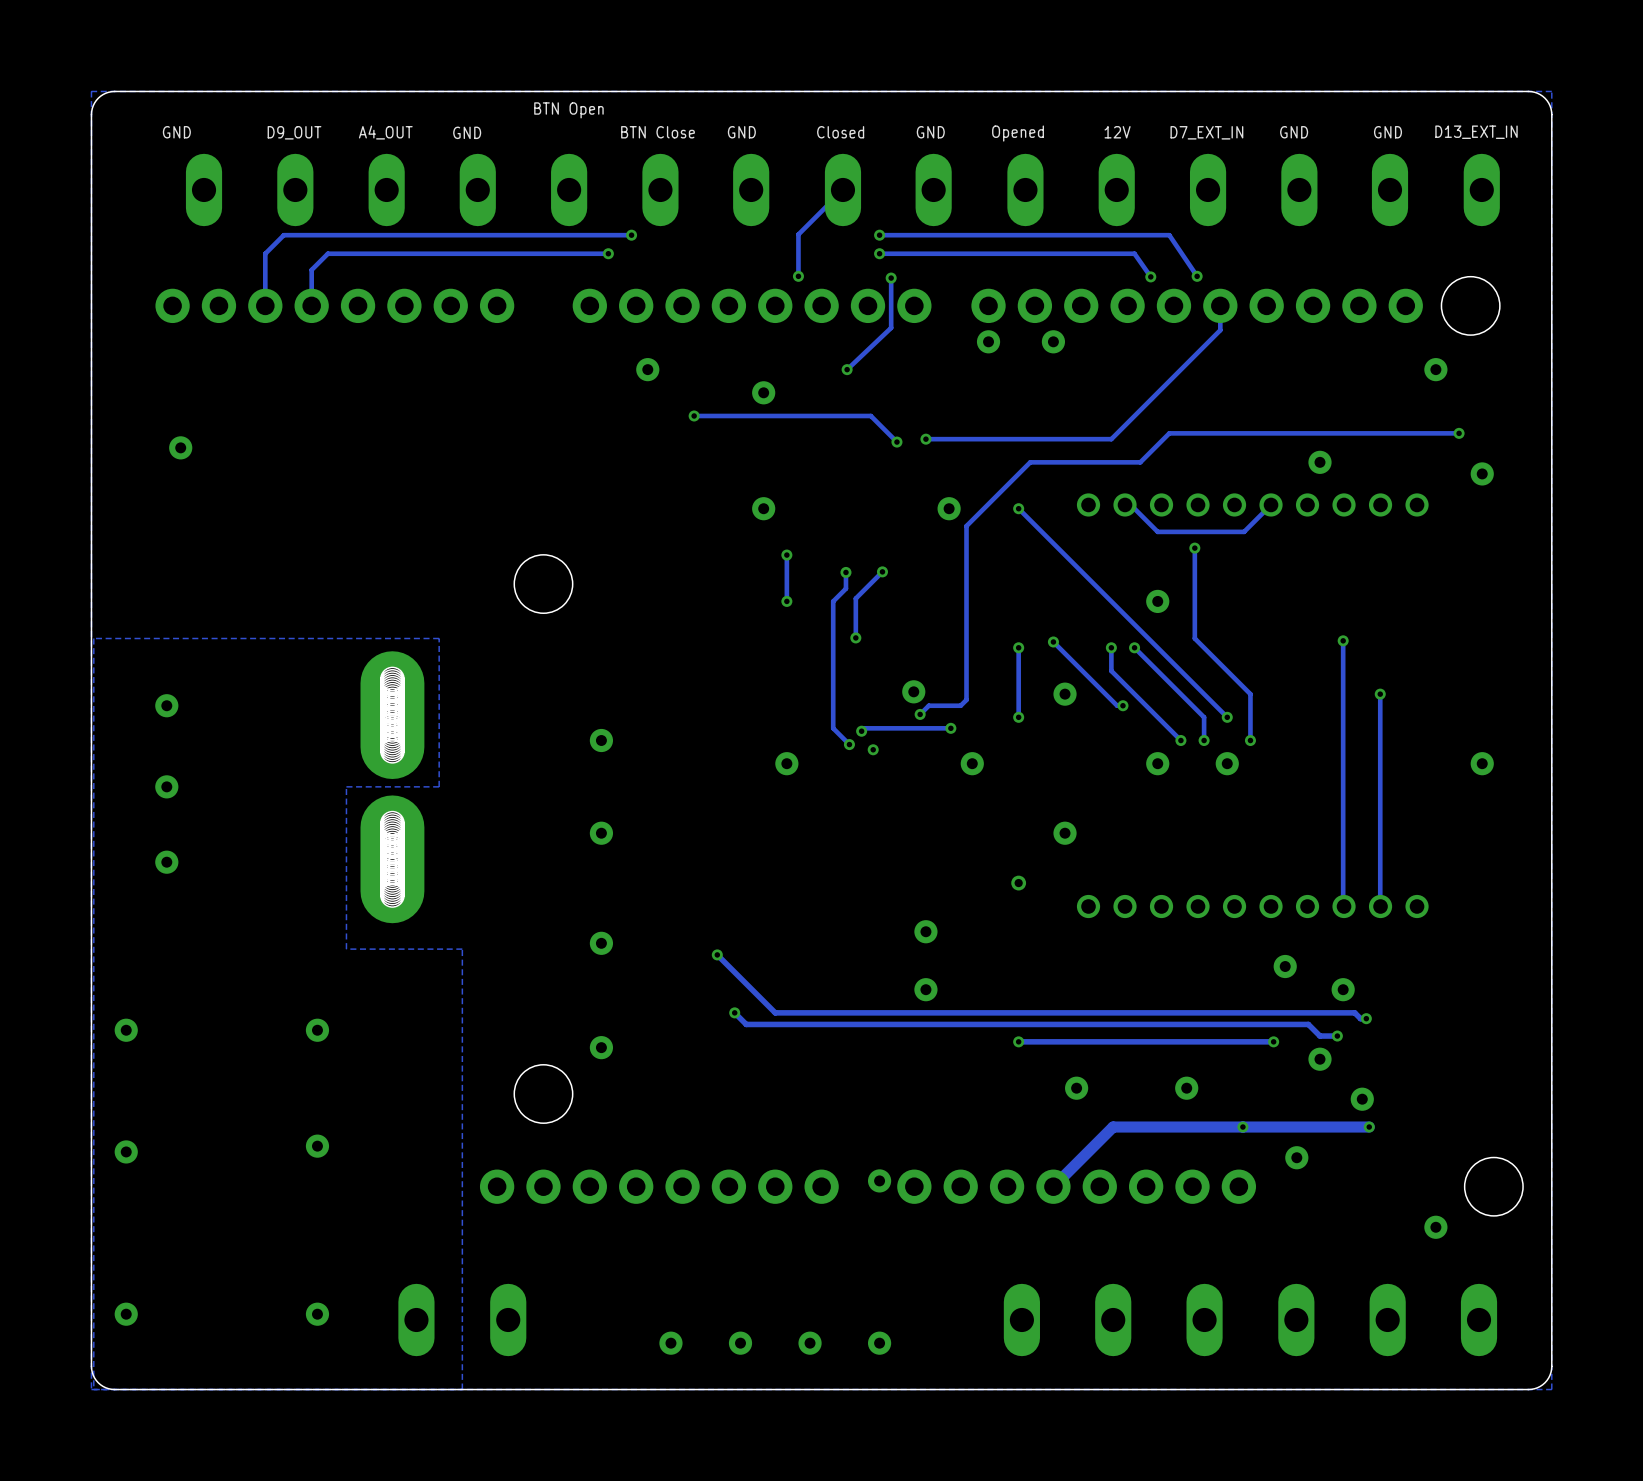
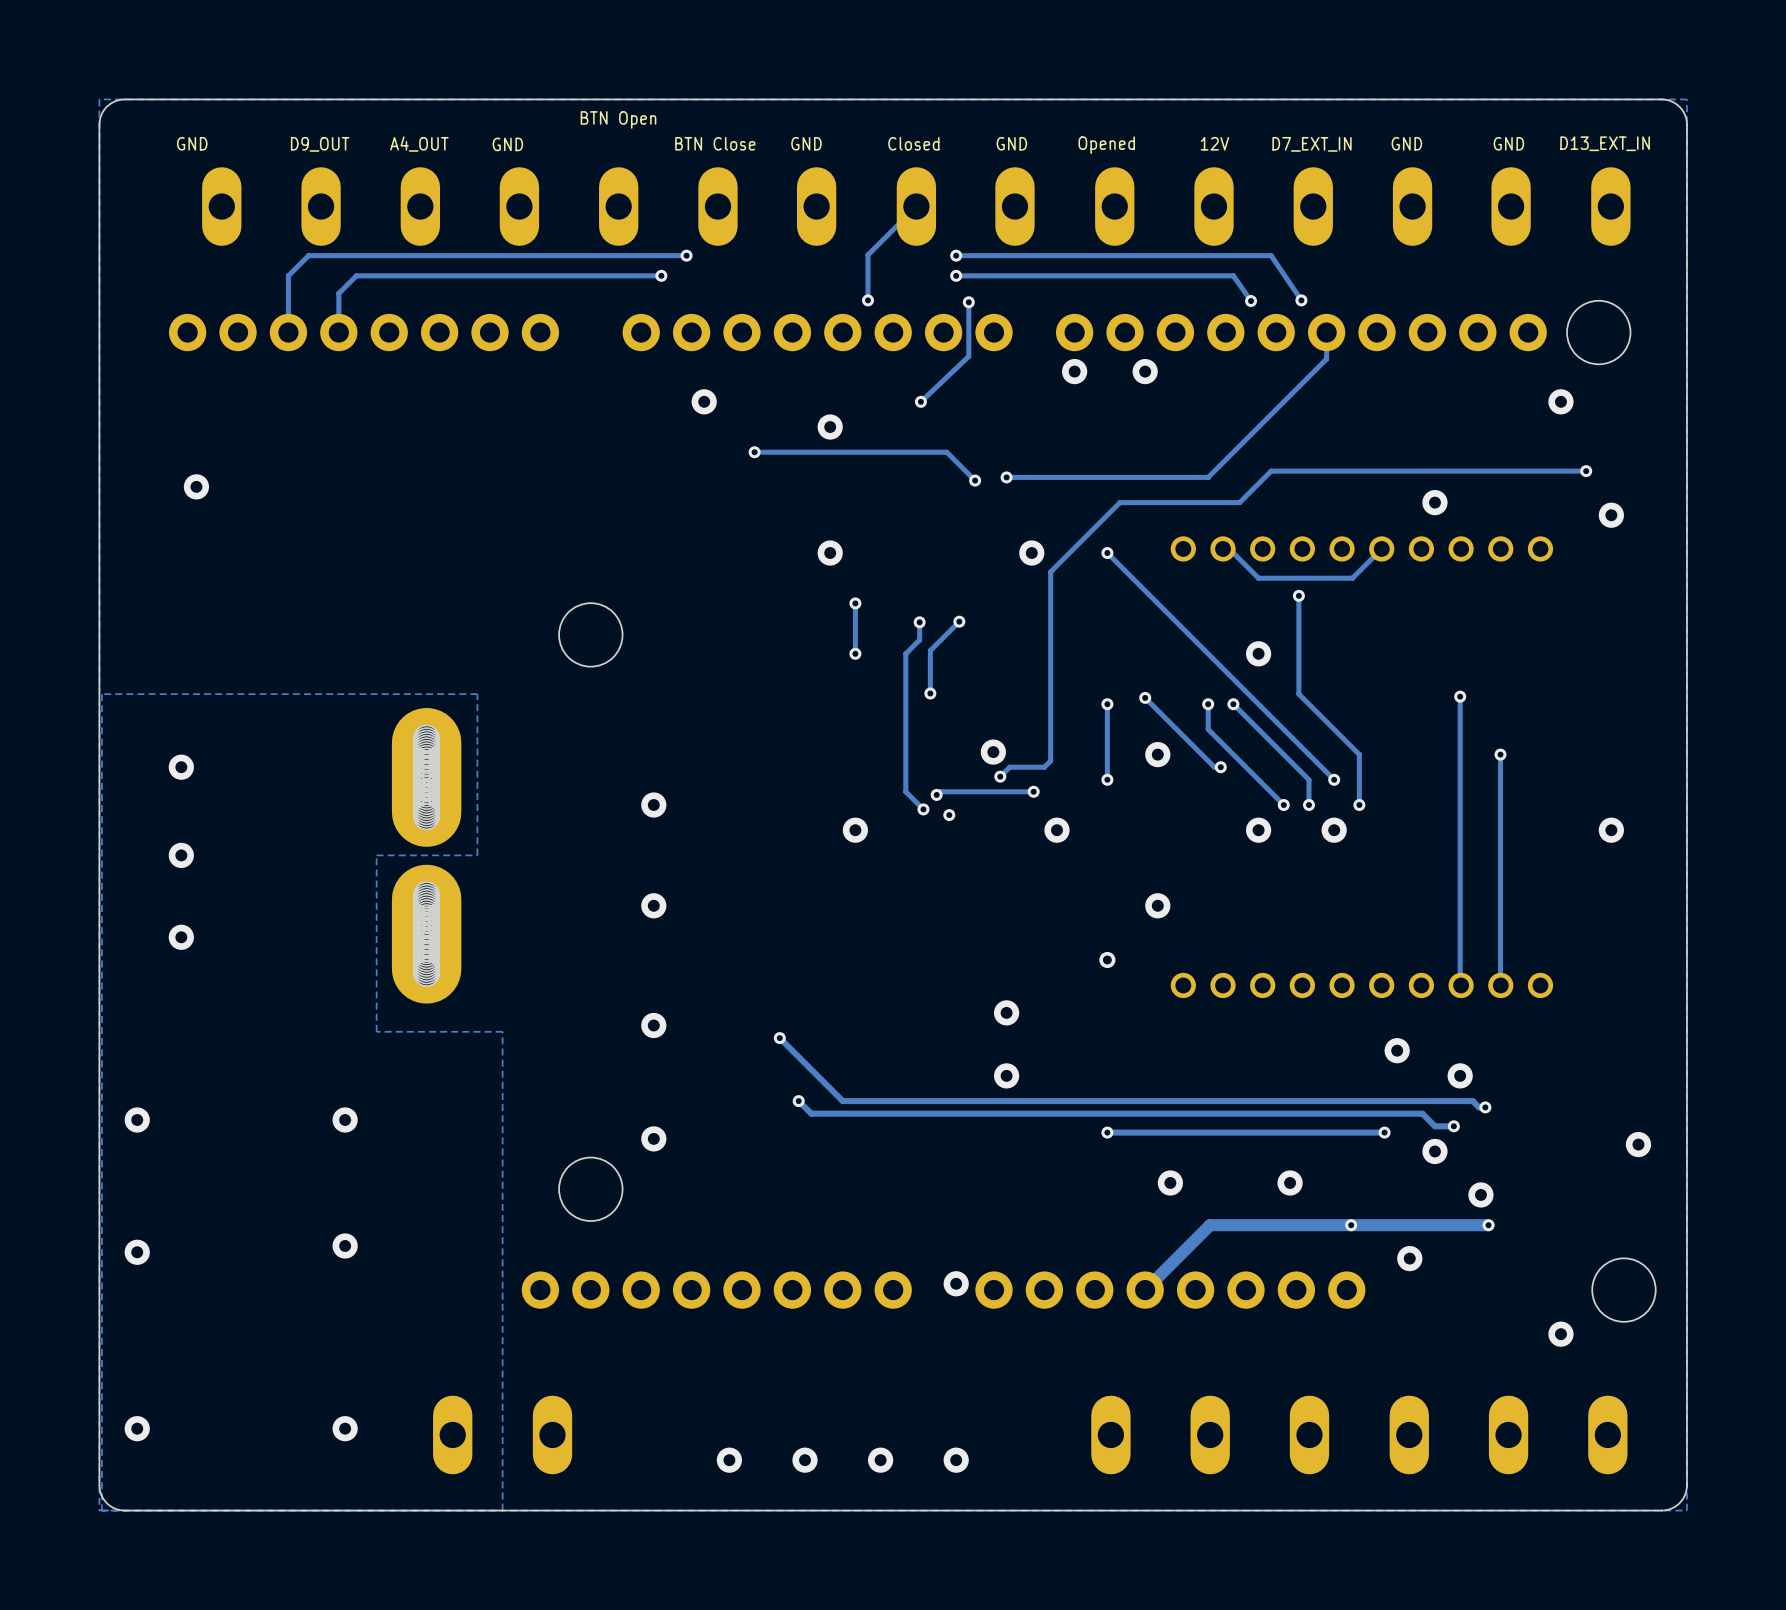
via: none -> (1638, 1144)

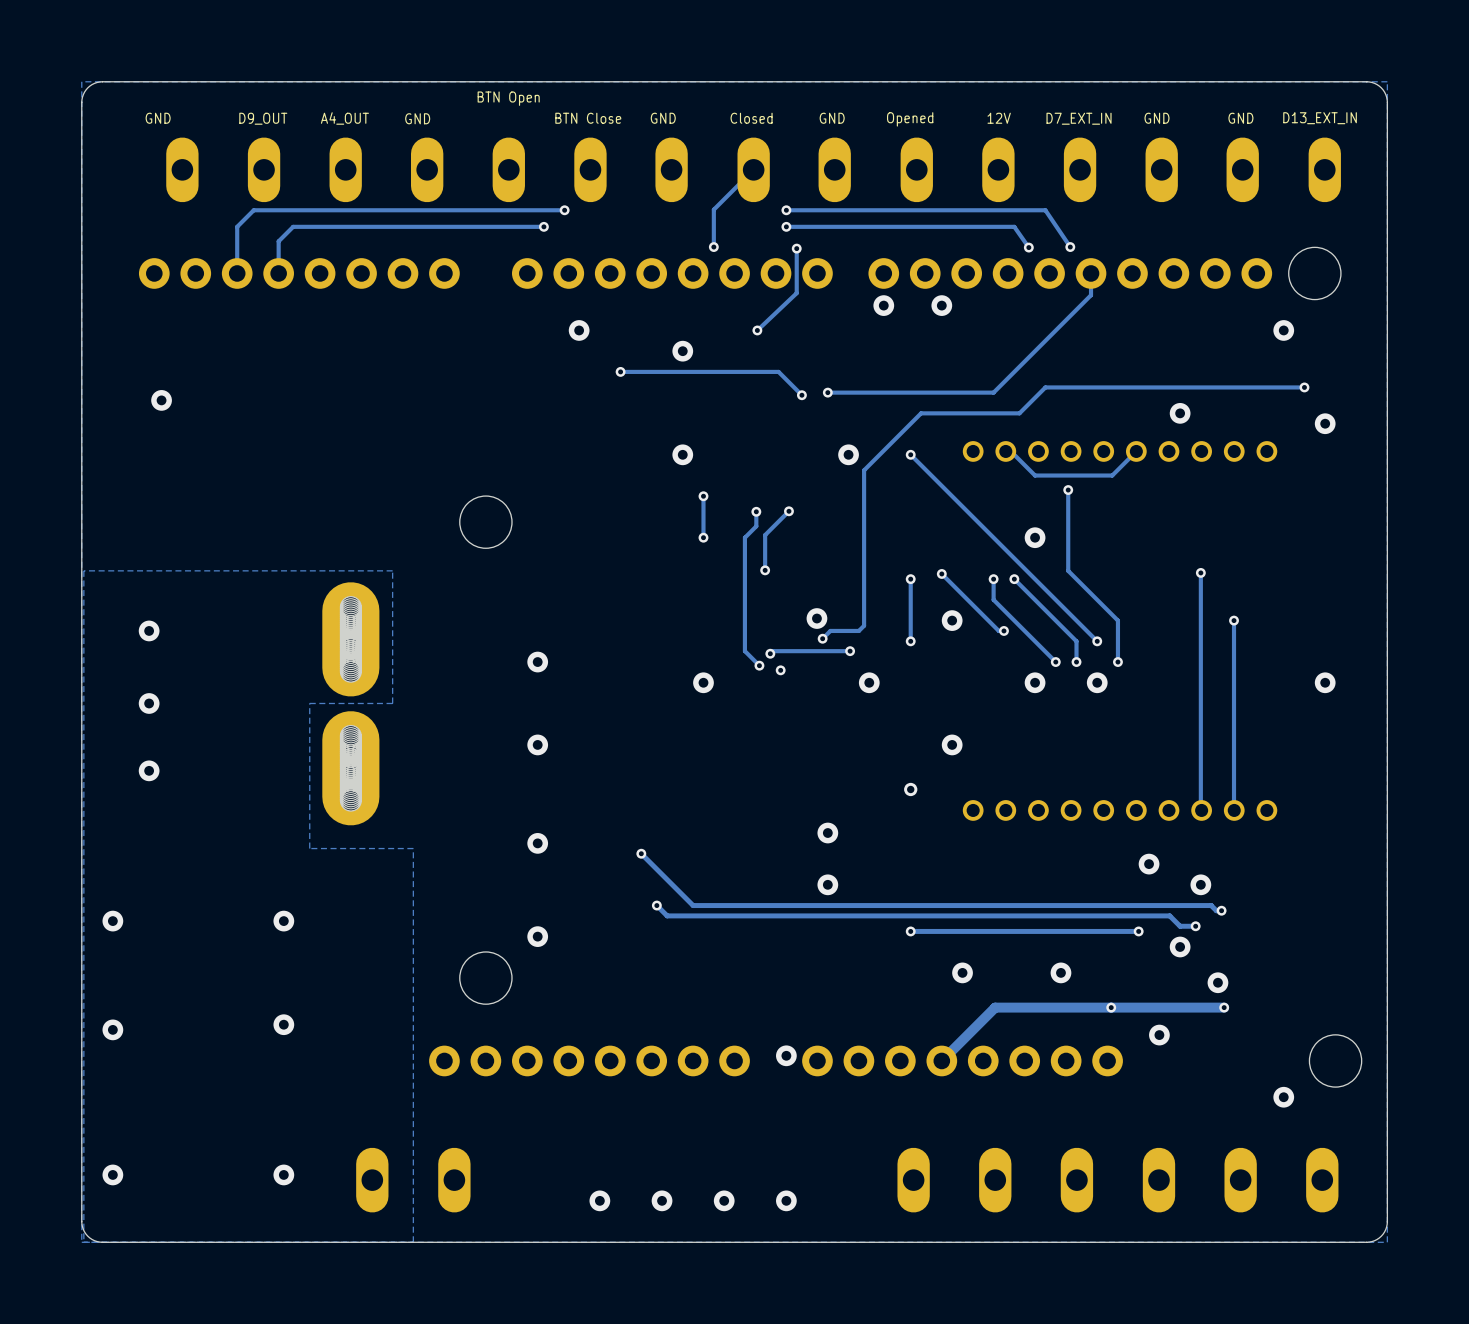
via: (1638, 1144) -> none

